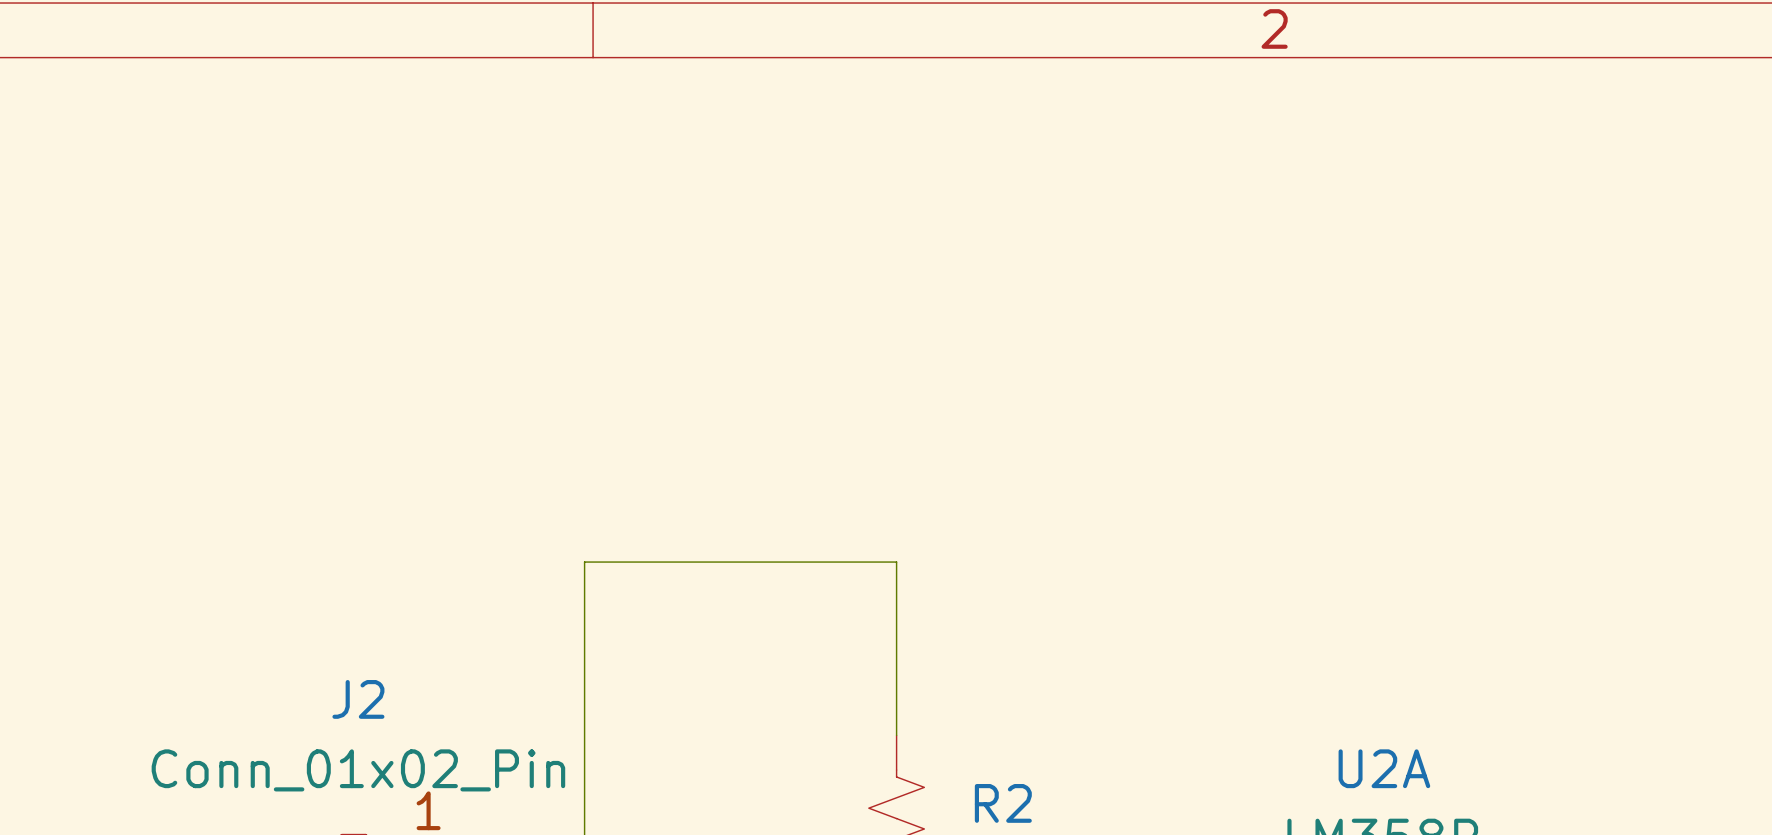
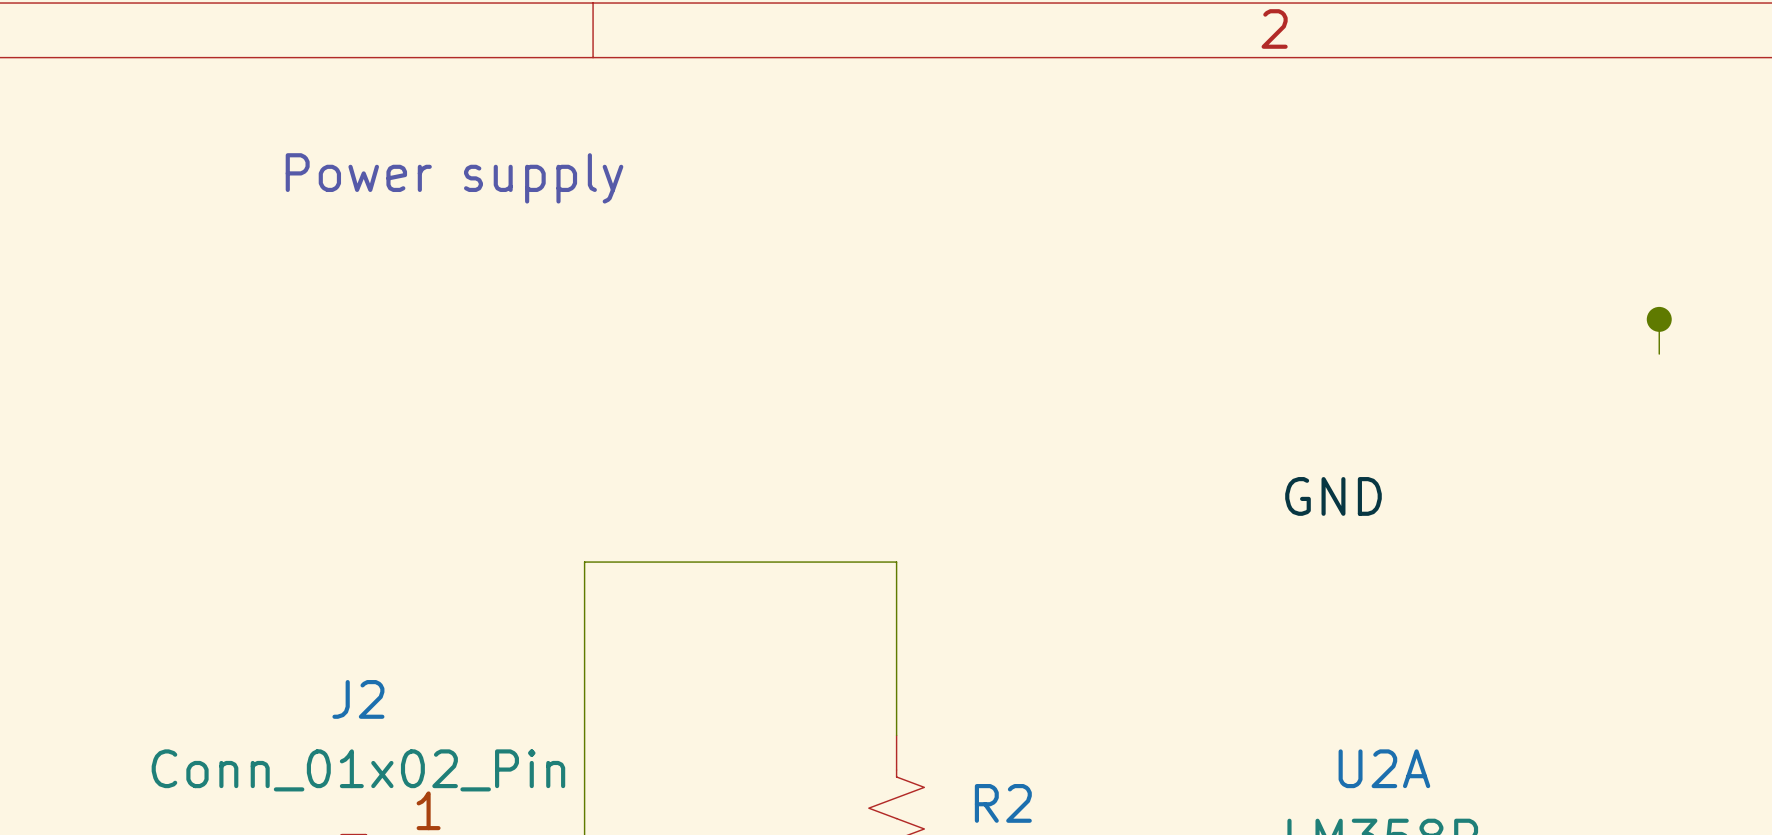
text: none -> Power supply (454, 178)
wire: none -> (1659, 319) (1659, 354)
junction: none -> (1659, 319)
label: none -> GND (1333, 496)

